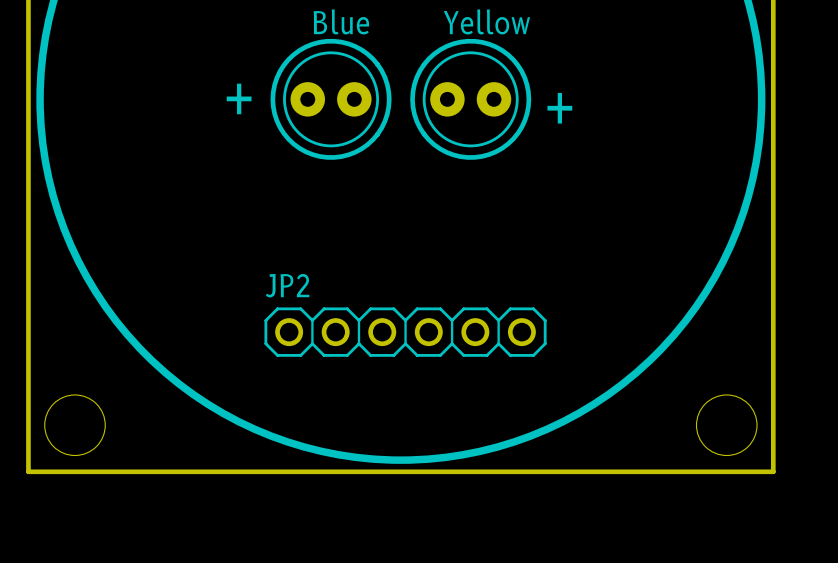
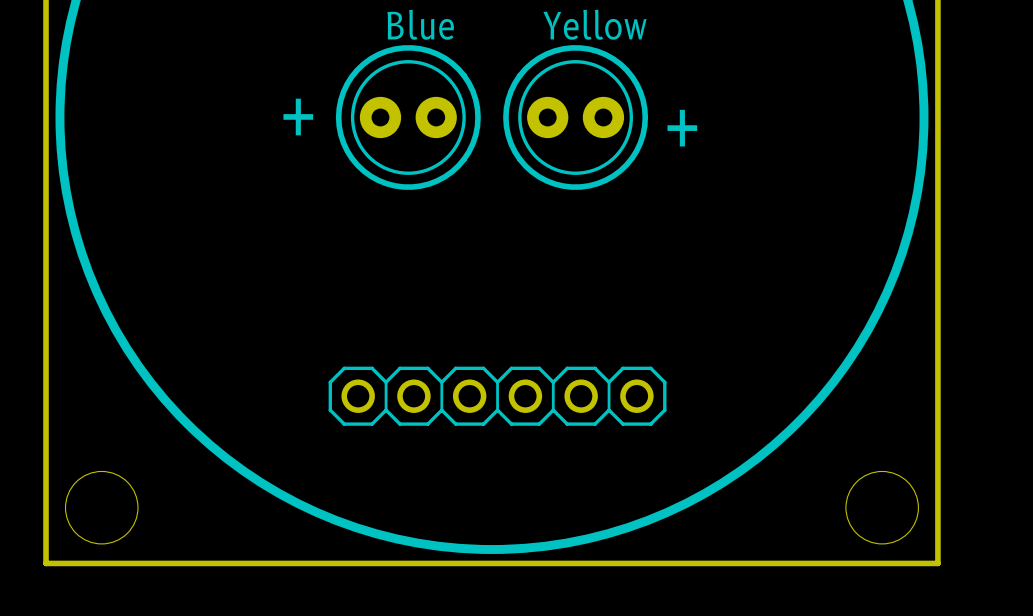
JP2 name: JP2 (287, 285) -> none

